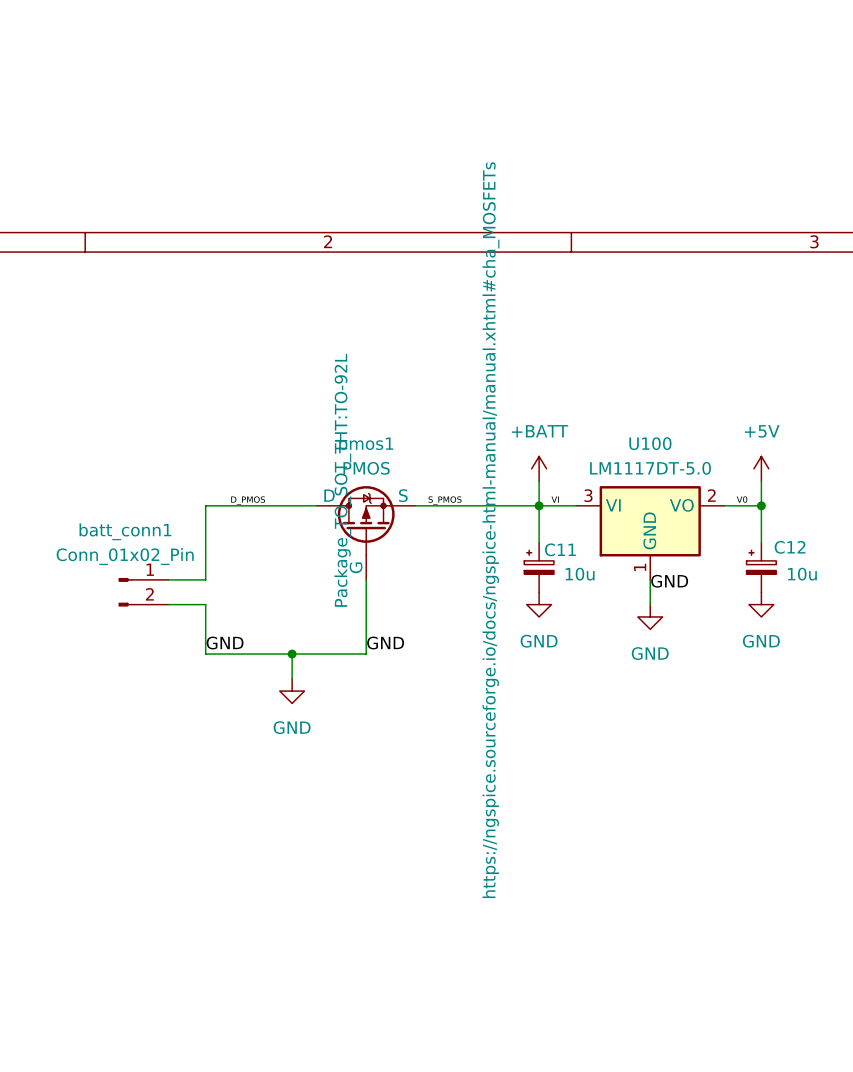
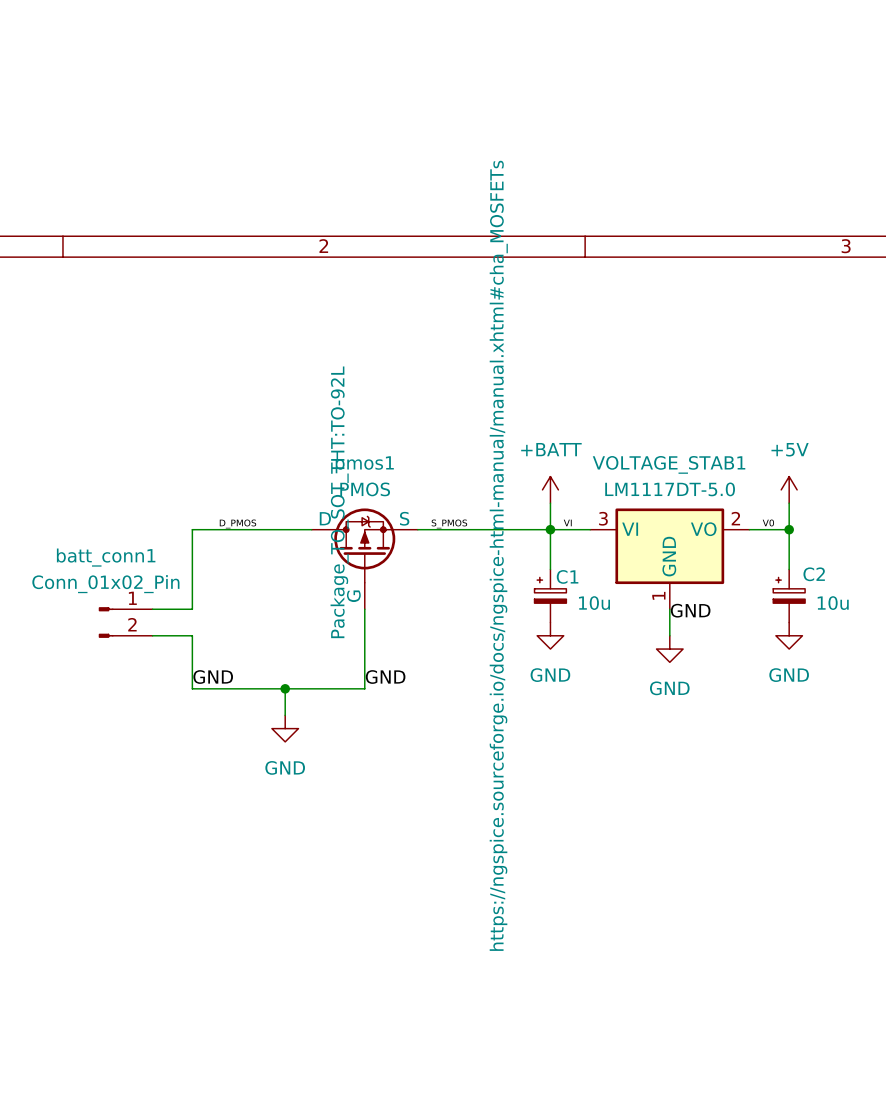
U100 name: U100 (650, 443) -> VOLTAGE_STAB1 (669, 464)
C12 name: C12 (790, 547) -> C2 (814, 574)
C11 name: C11 (560, 549) -> C1 (567, 576)

